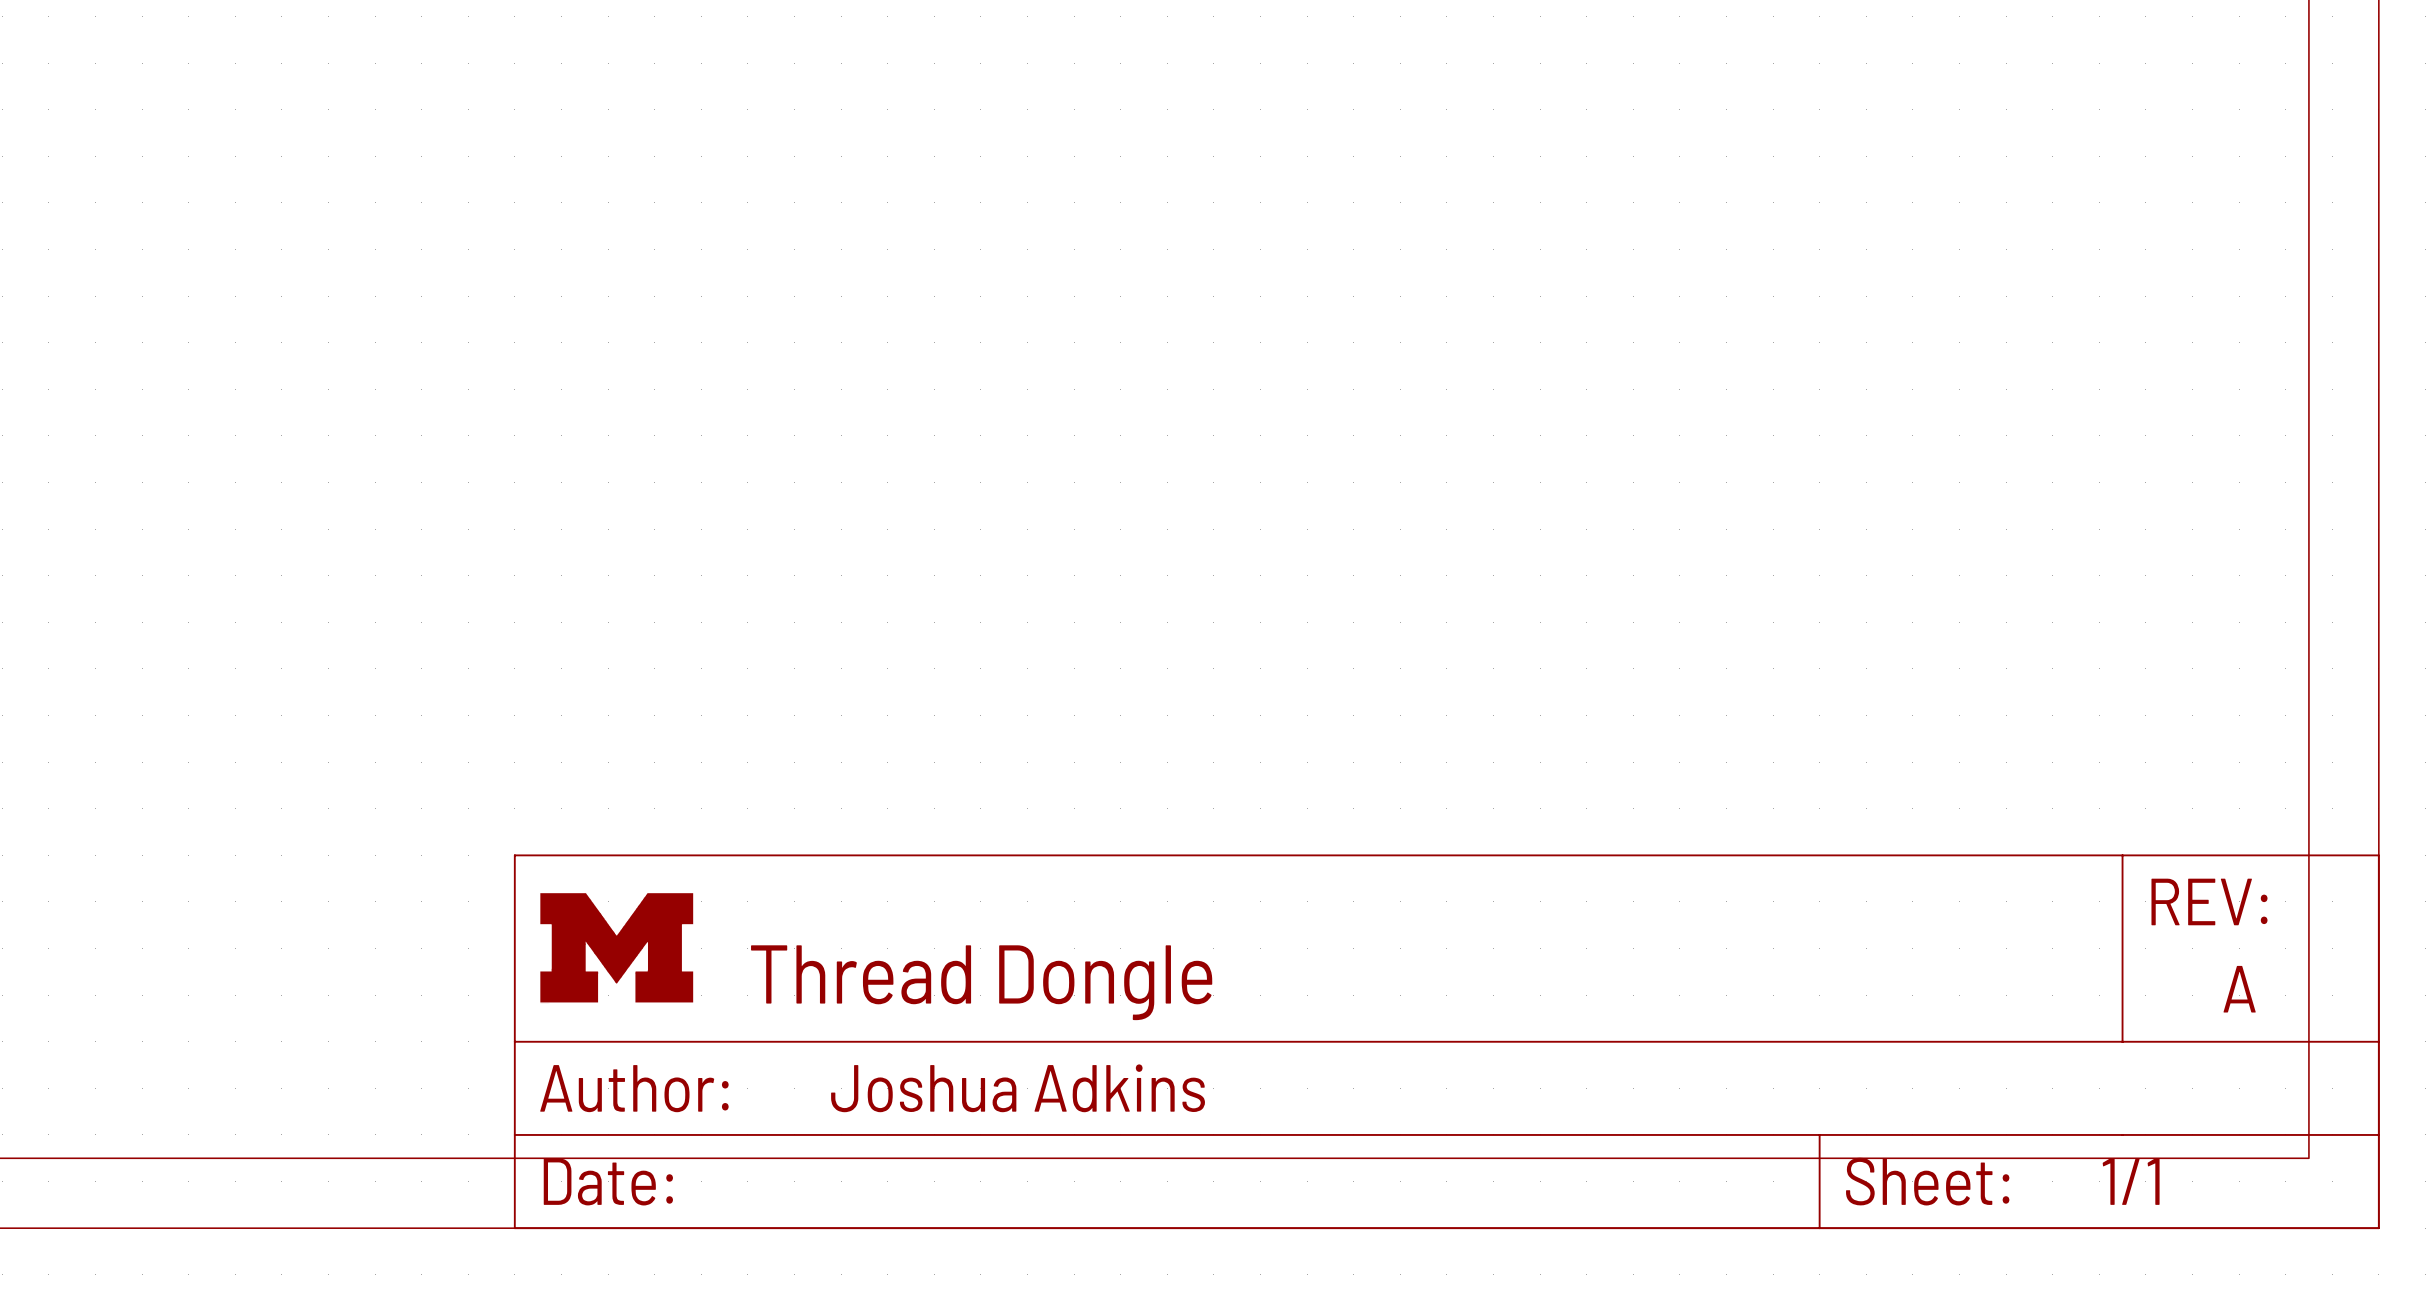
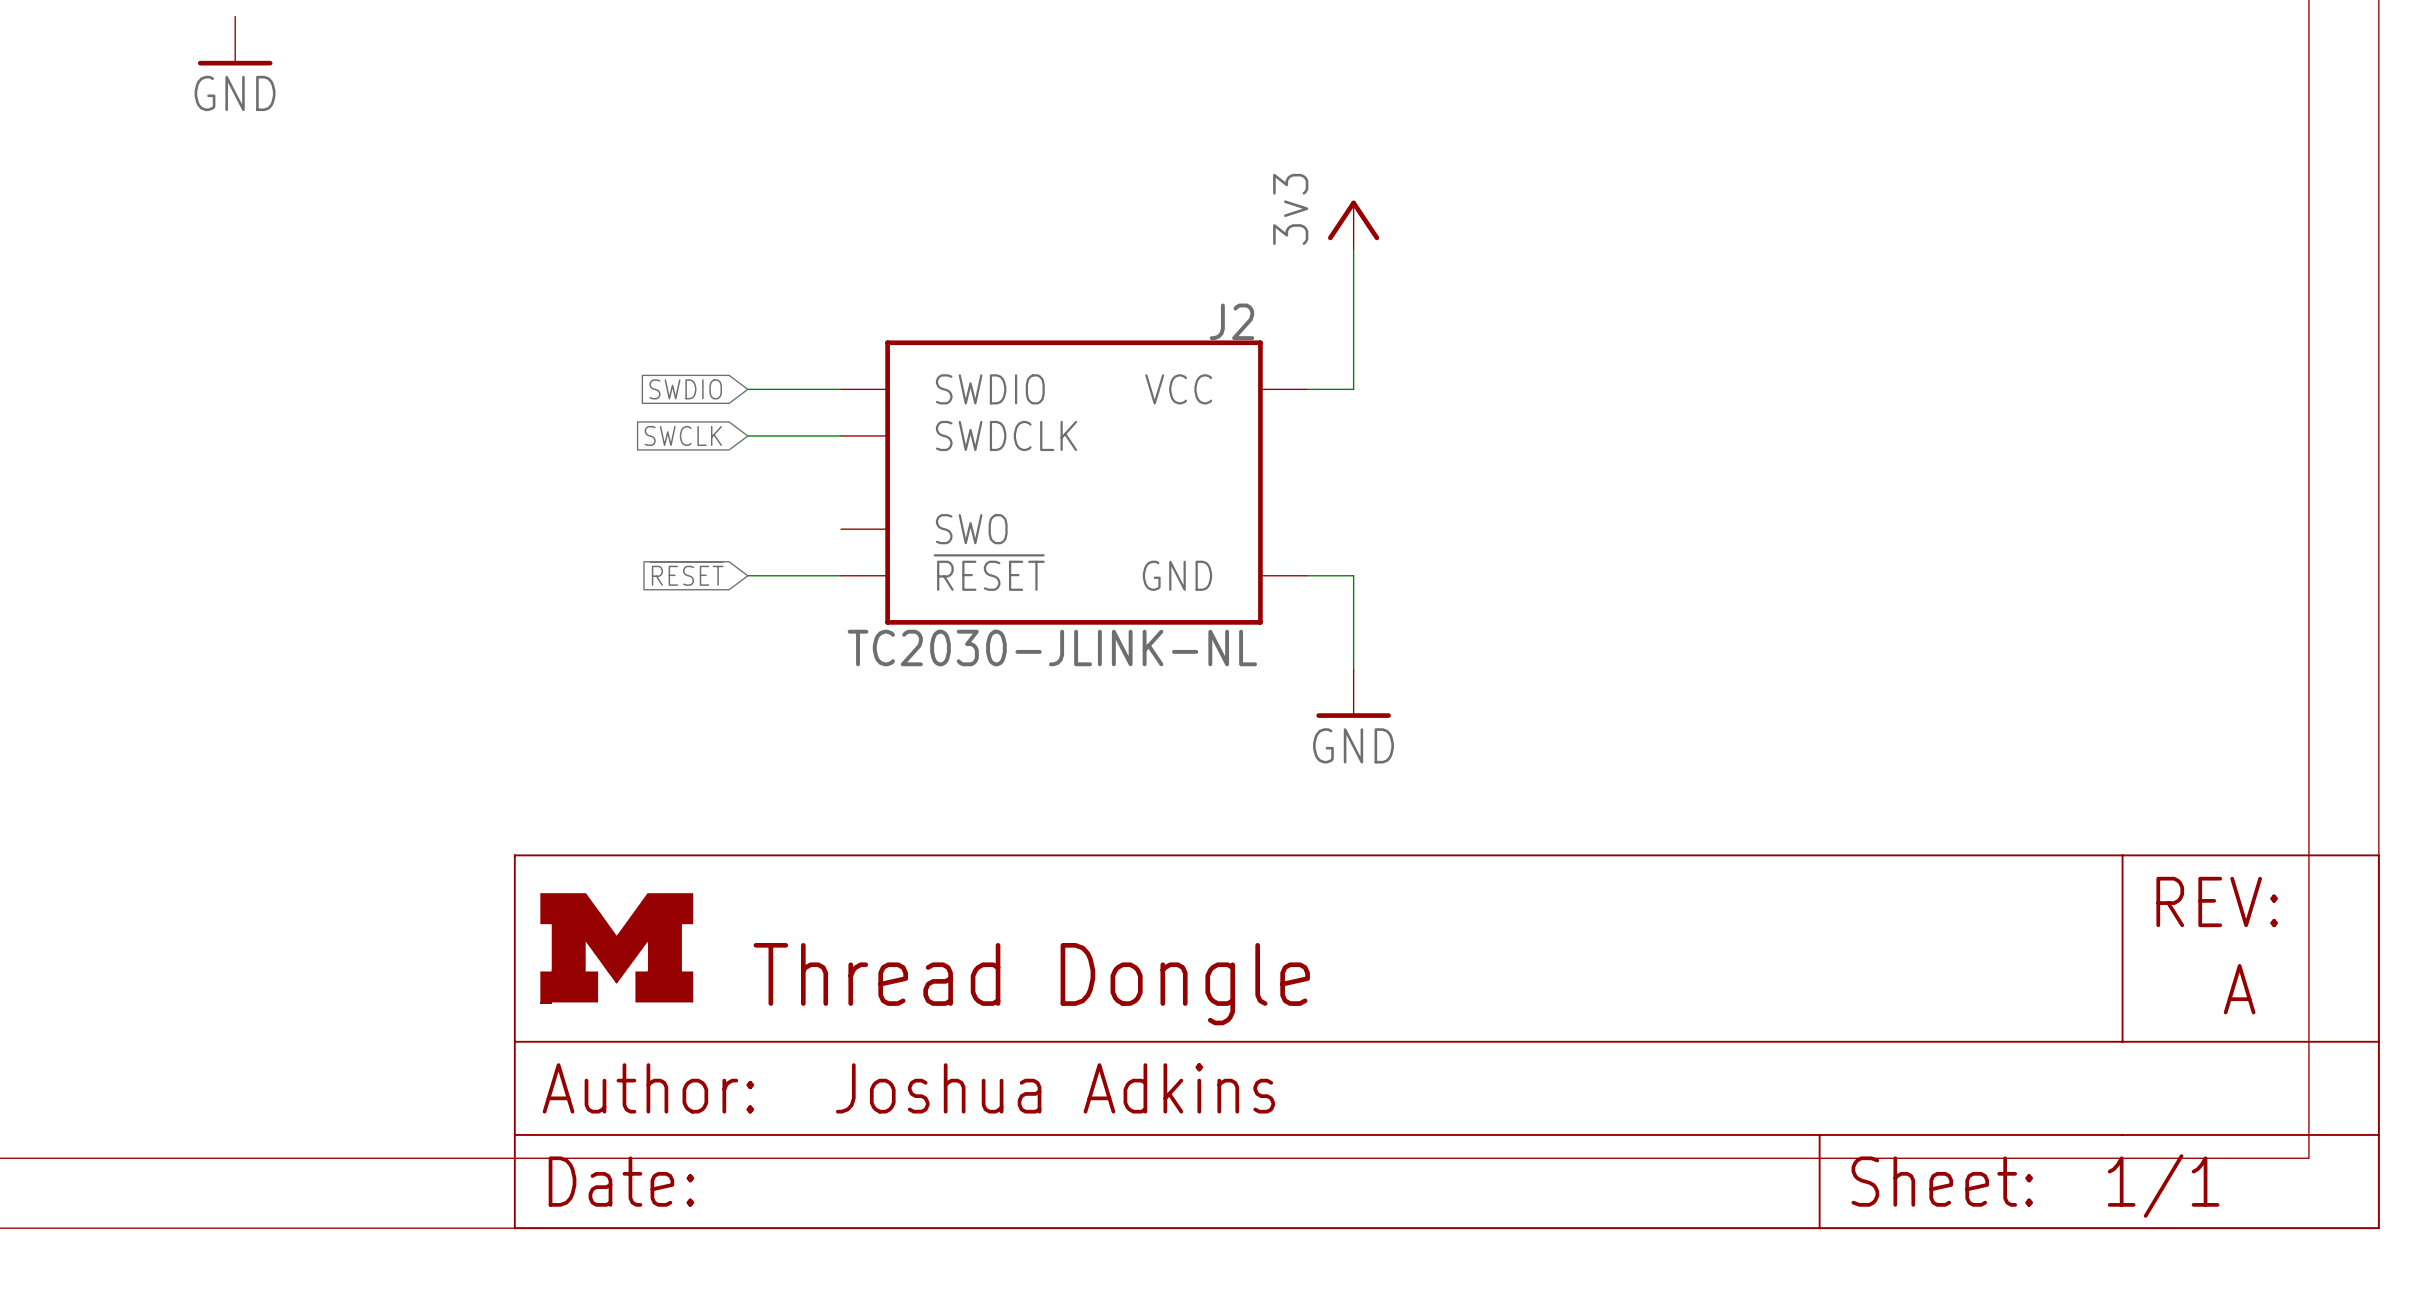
power symbol: none -> GND (235, 41)
power symbol: none -> 3v3 (1353, 225)
wire: none -> (1353, 249) (1353, 389) (1307, 389)
global label: none -> SWDIO (685, 389)
wire: none -> (747, 389) (841, 389)
global label: none -> SWCLK (683, 435)
wire: none -> (747, 435) (841, 435)
J2: none -> TC2030-JLINK-NL (1074, 482)
global label: none -> ~{RESET} (686, 573)
wire: none -> (747, 575) (841, 575)
wire: none -> (1307, 575) (1353, 575) (1353, 668)
power symbol: none -> GND (1353, 693)

